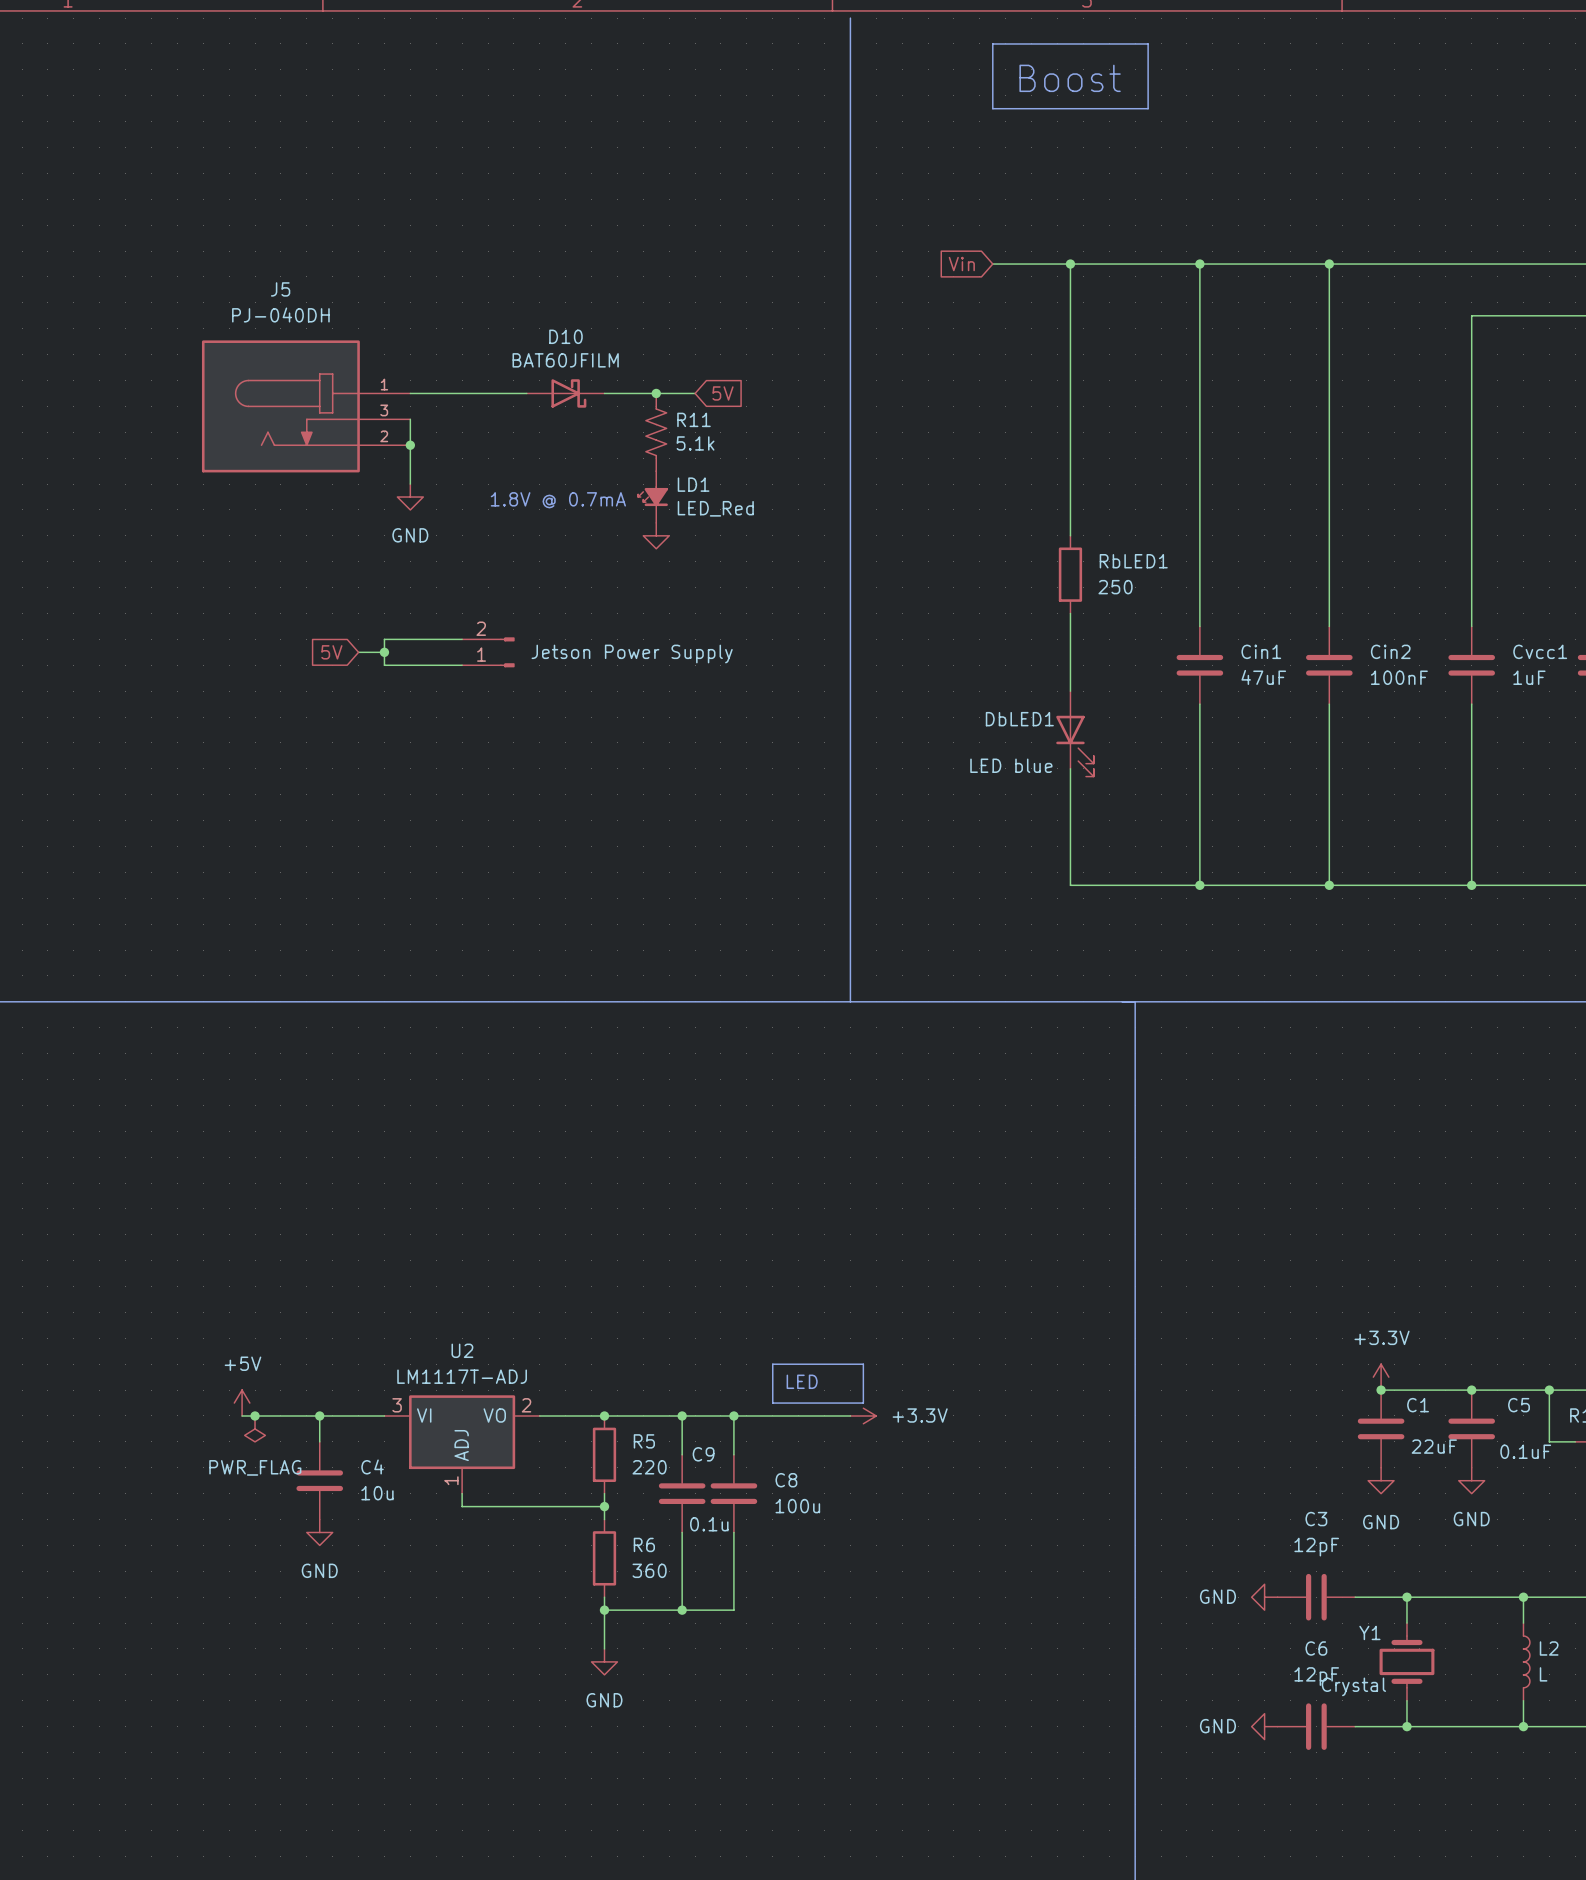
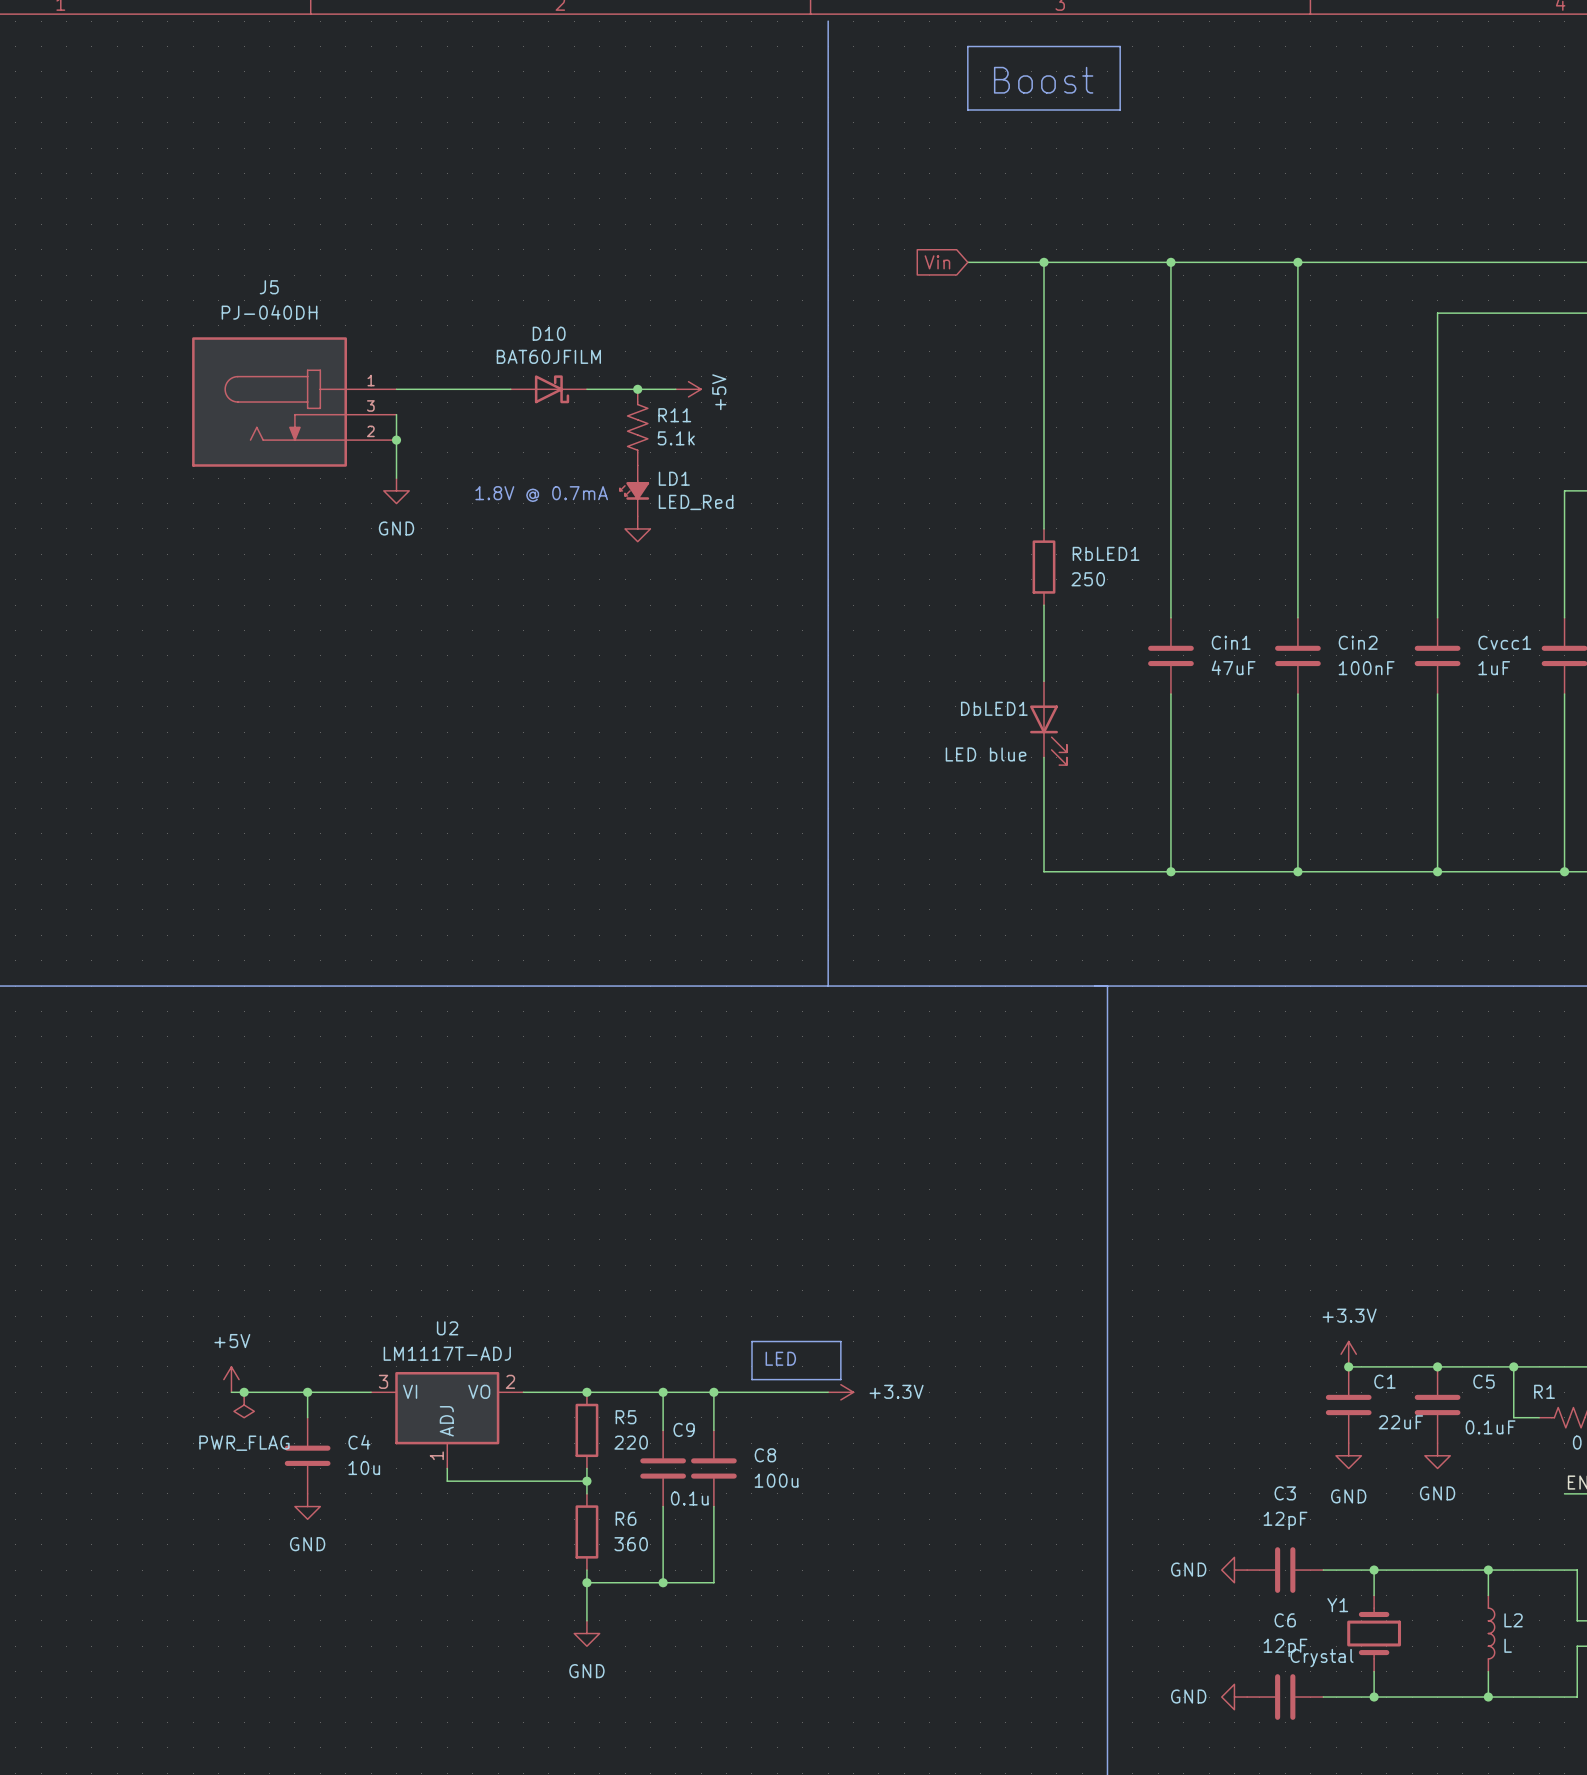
power symbol: none -> +5V (688, 389)
global label: 5V (723, 393) -> none
wire: (462, 639) (384, 639) (384, 665) (462, 665) -> none
global label: 5V (331, 652) -> none
wire: (358, 652) (384, 652) -> none
junction: (384, 652) -> none
part: Jetson Power Supply (488, 652) -> none

